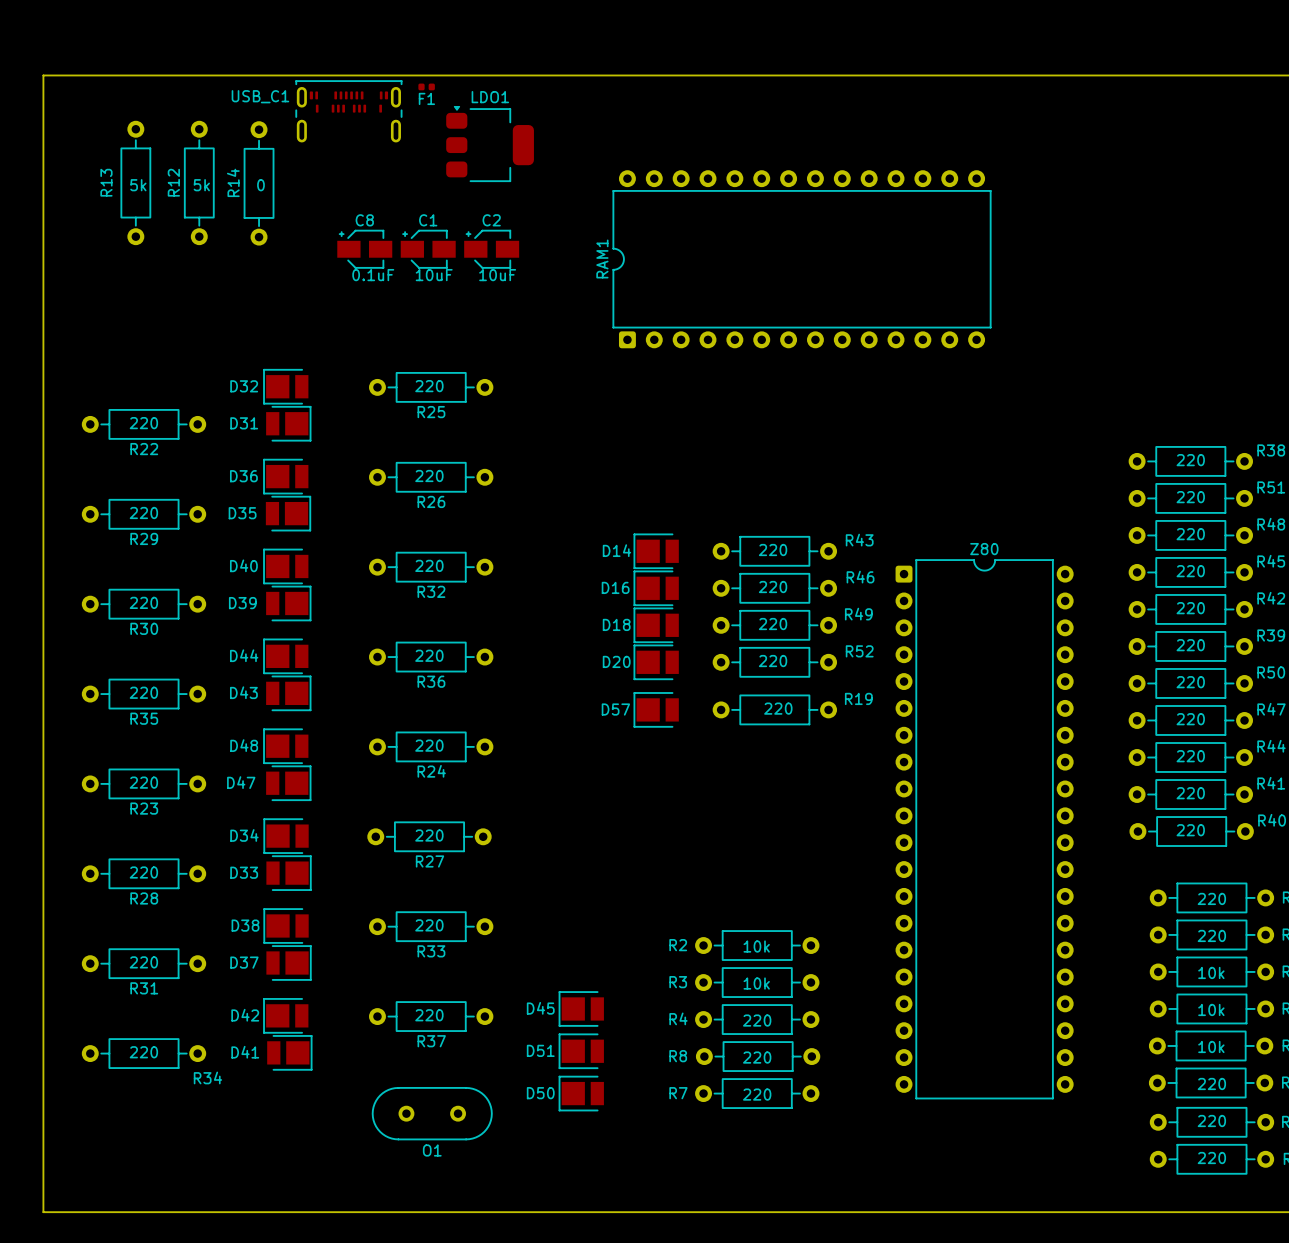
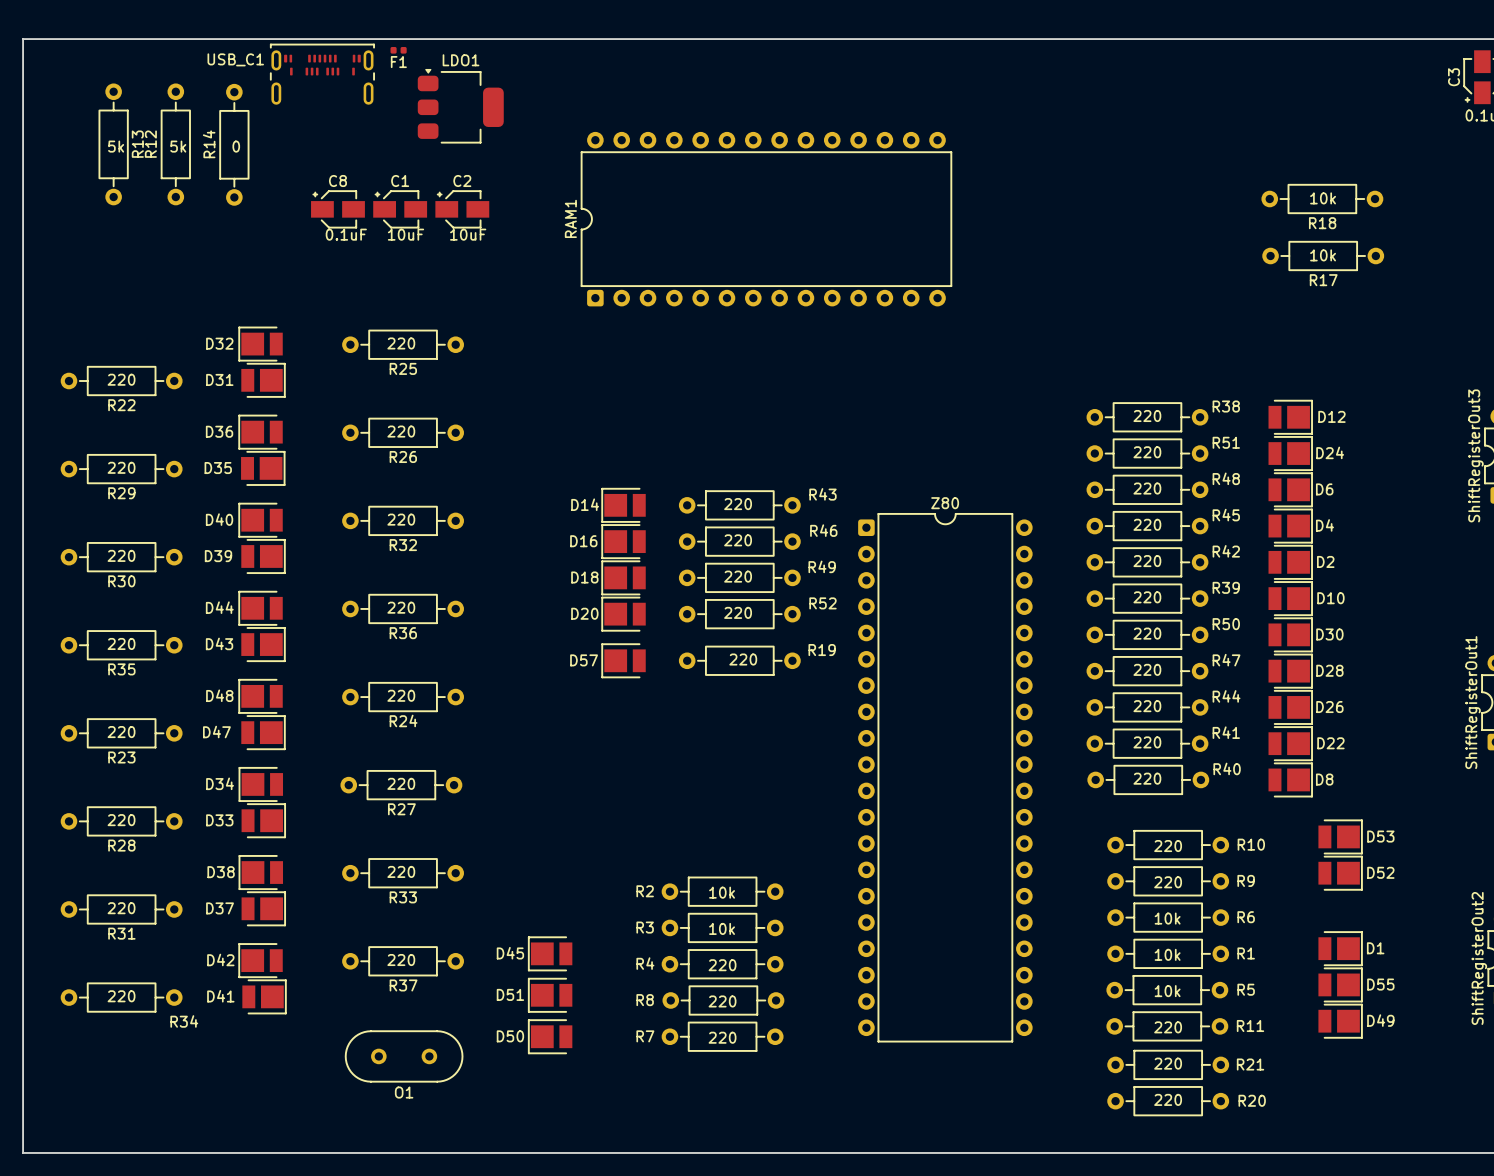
R13 name position: R13 (106, 182) -> R13 (137, 144)

